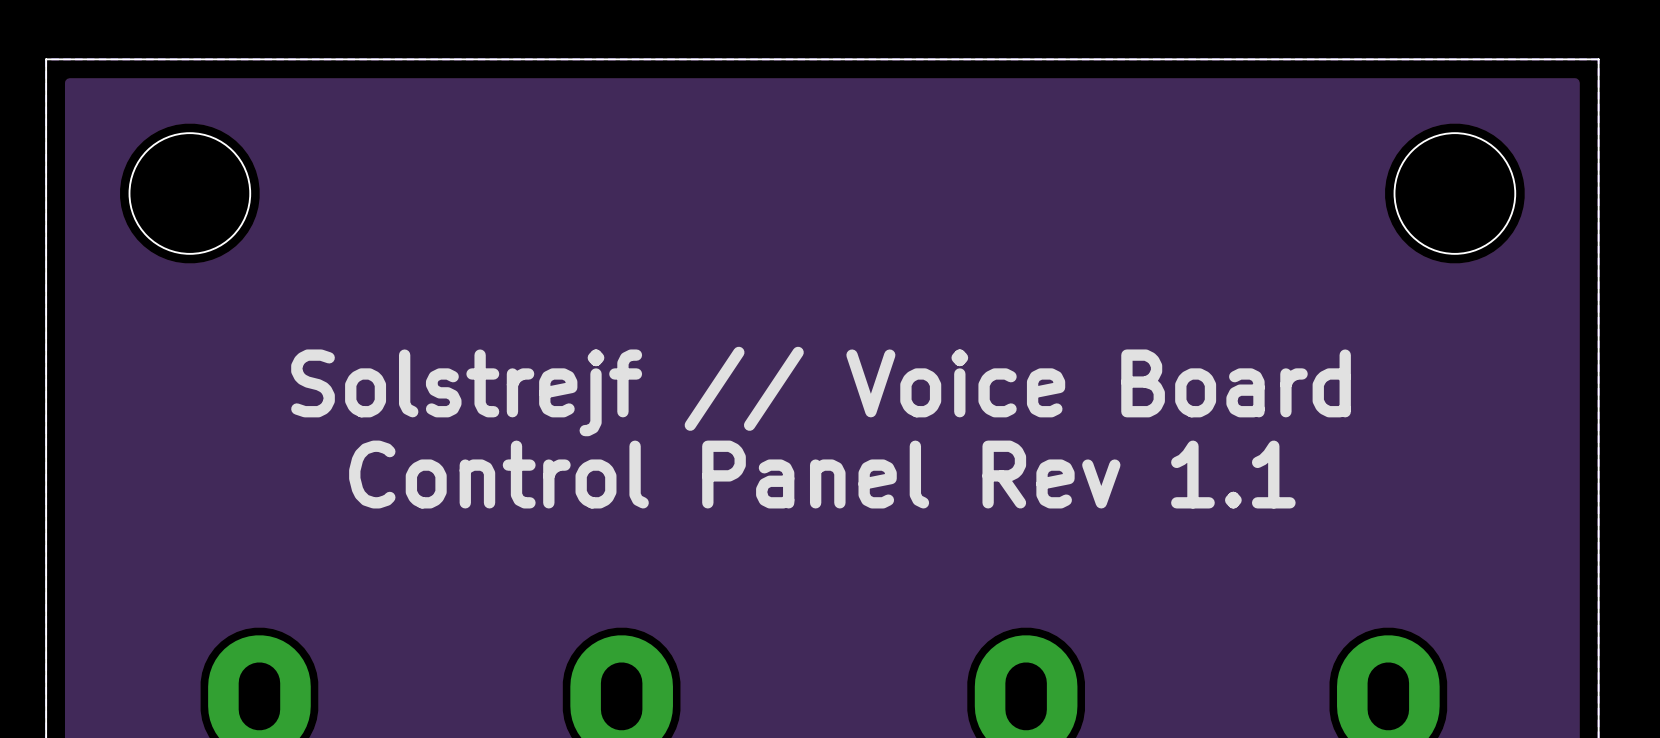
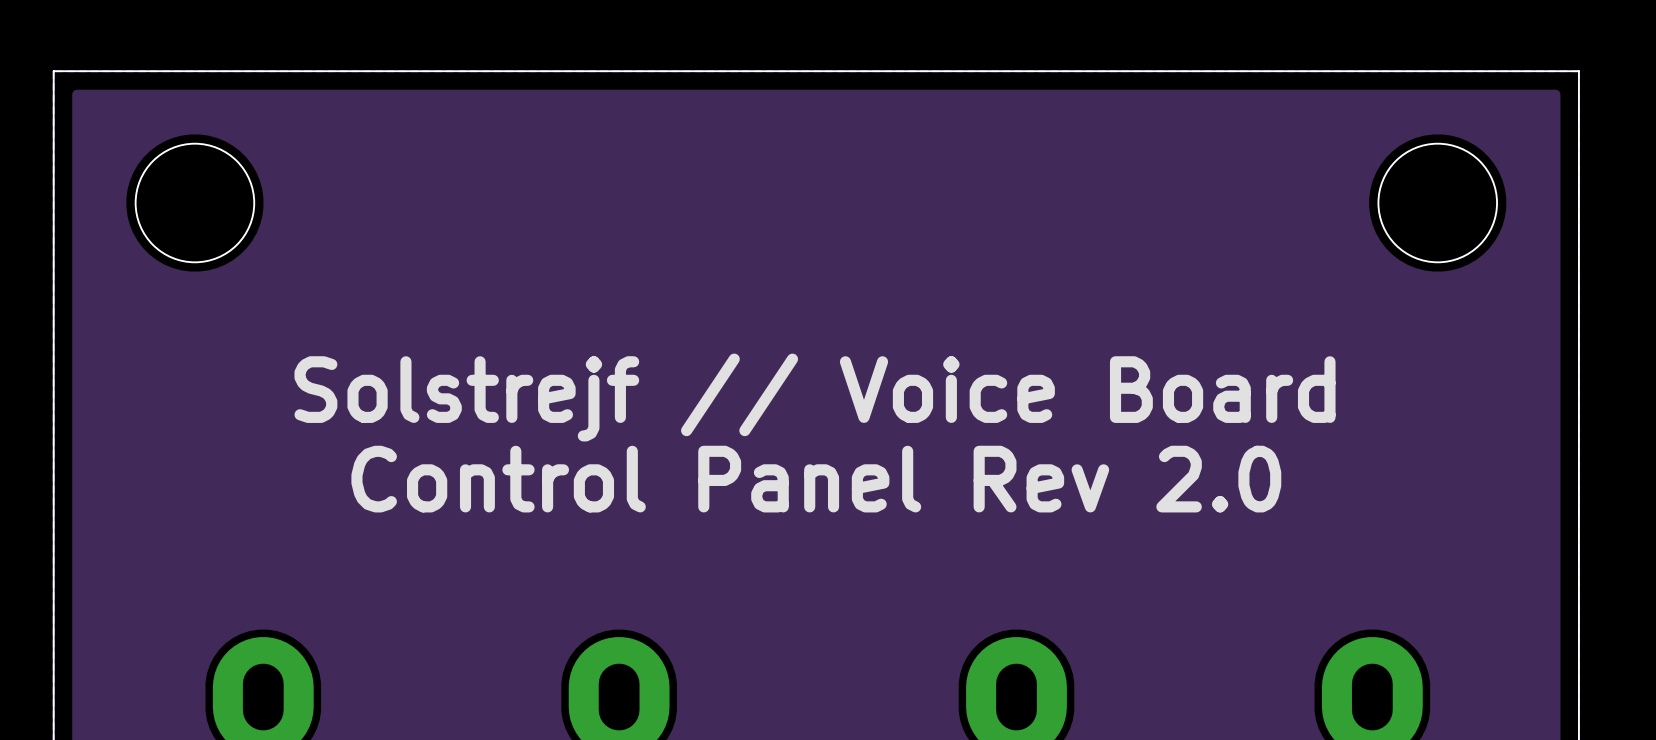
text: Control Panel Rev 1.1 (822, 474) -> Control Panel Rev 2.0 (816, 479)

